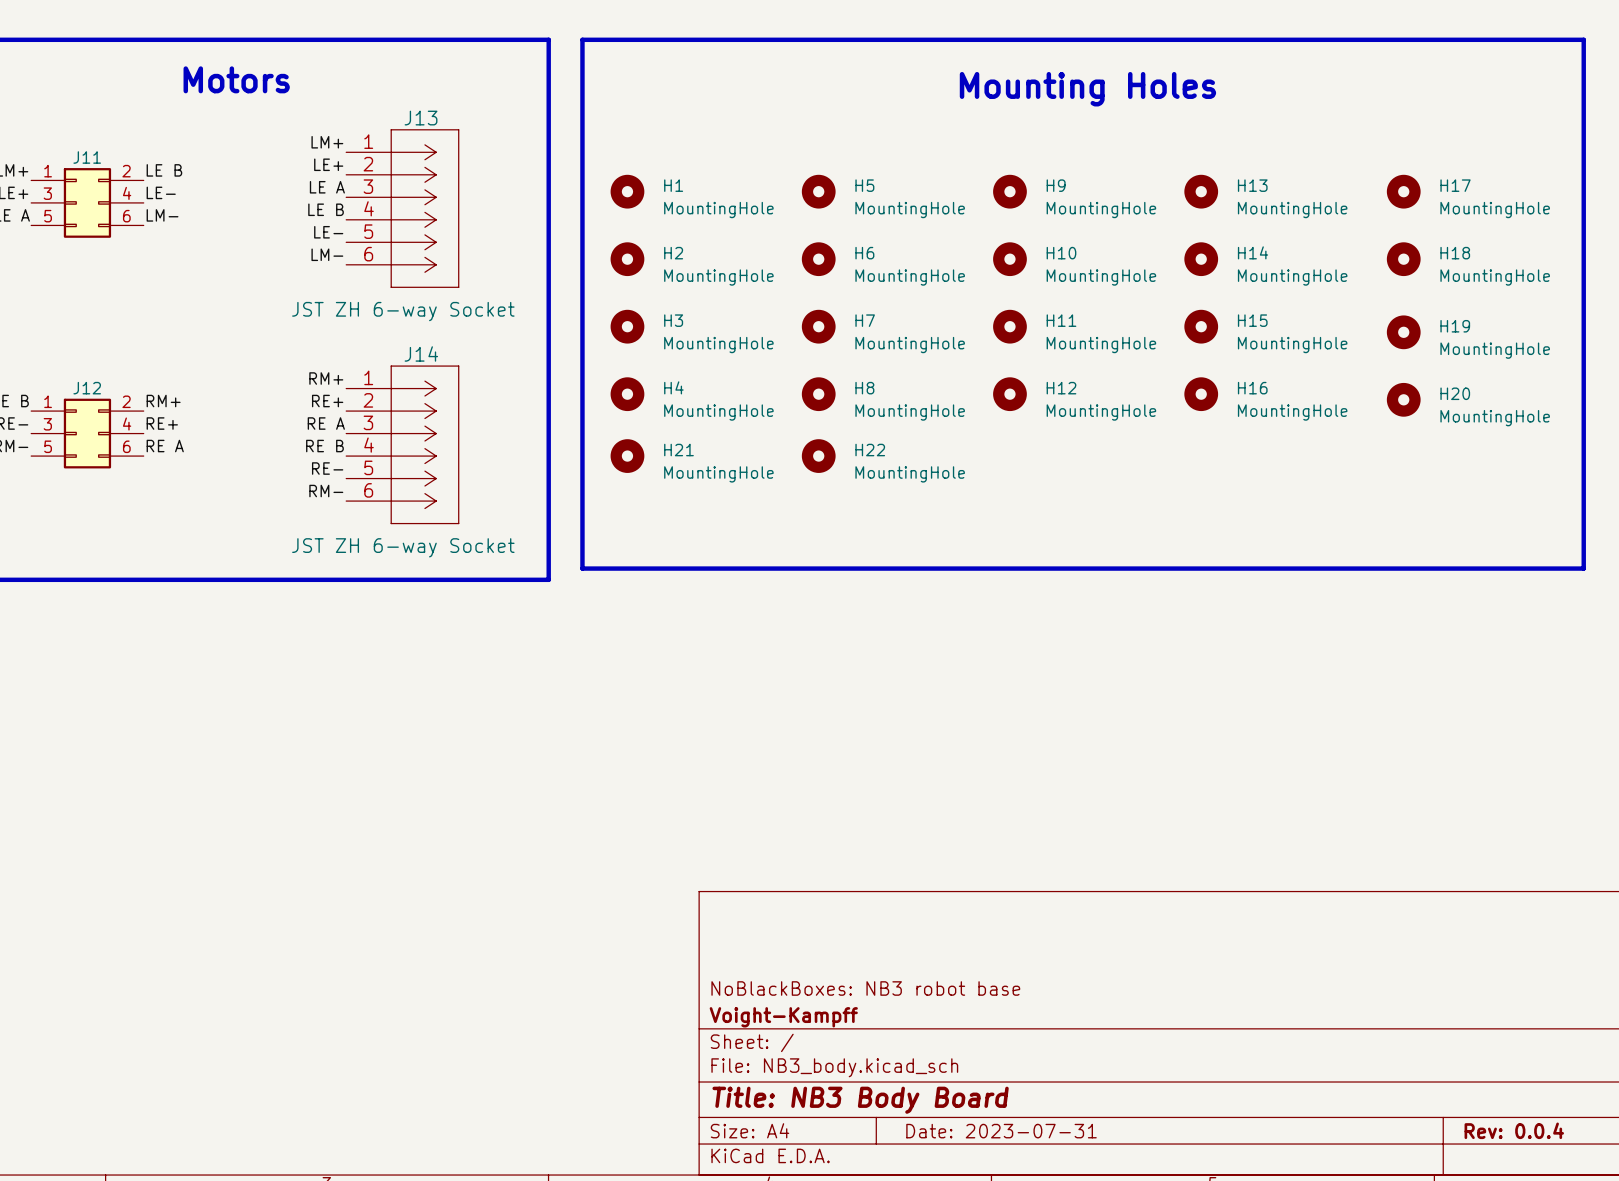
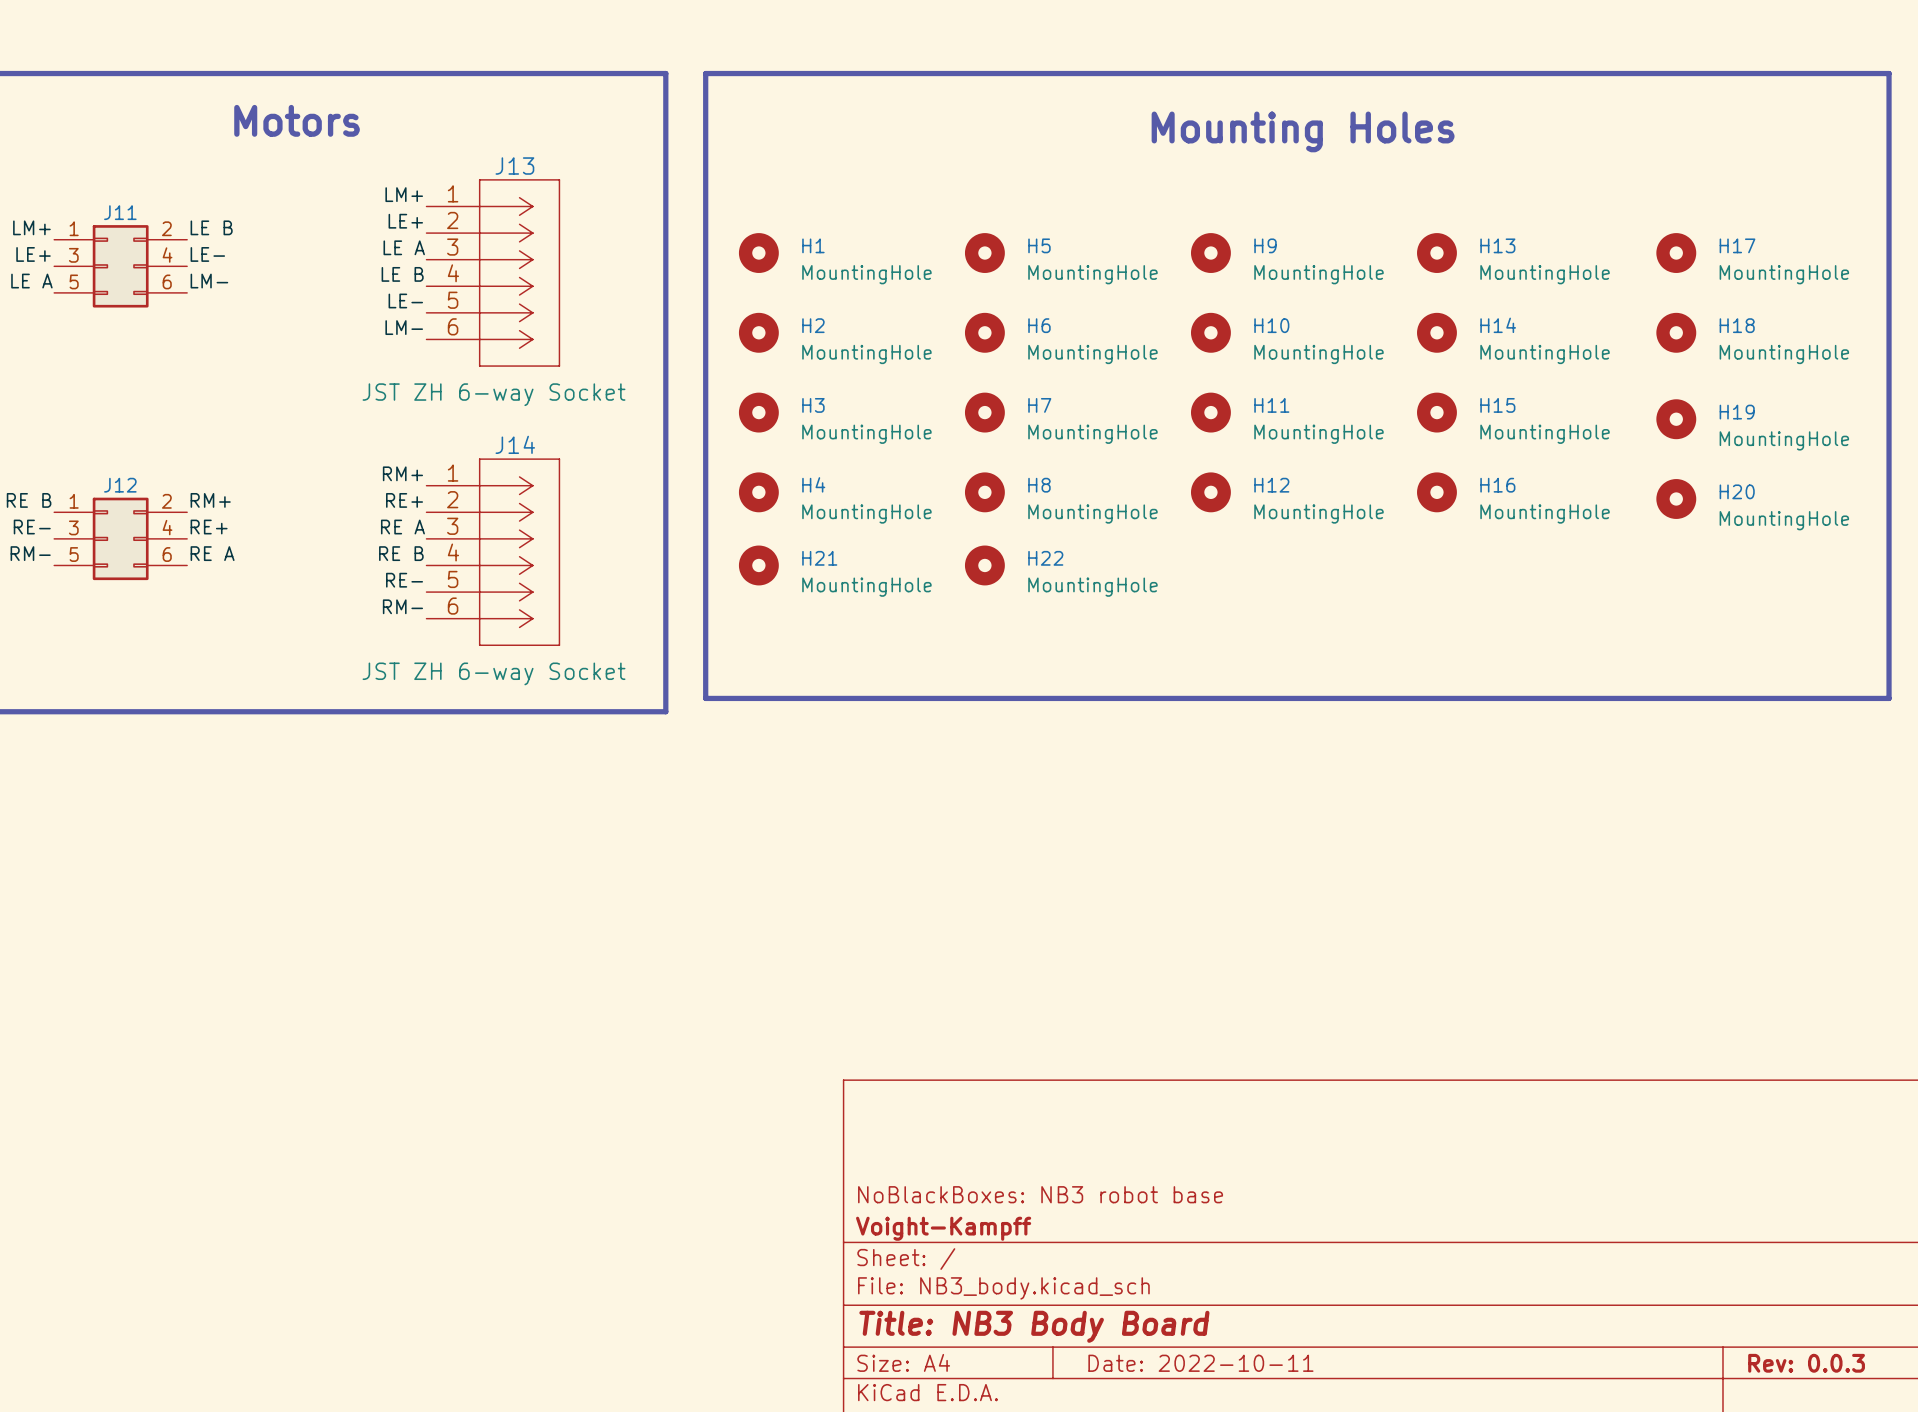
title block: Rev: 0.0.4 (1514, 1130) -> Rev: 0.0.3 (1806, 1363)
title block: Date: 2023-07-31 (1001, 1131) -> Date: 2022-10-11 (1200, 1363)

